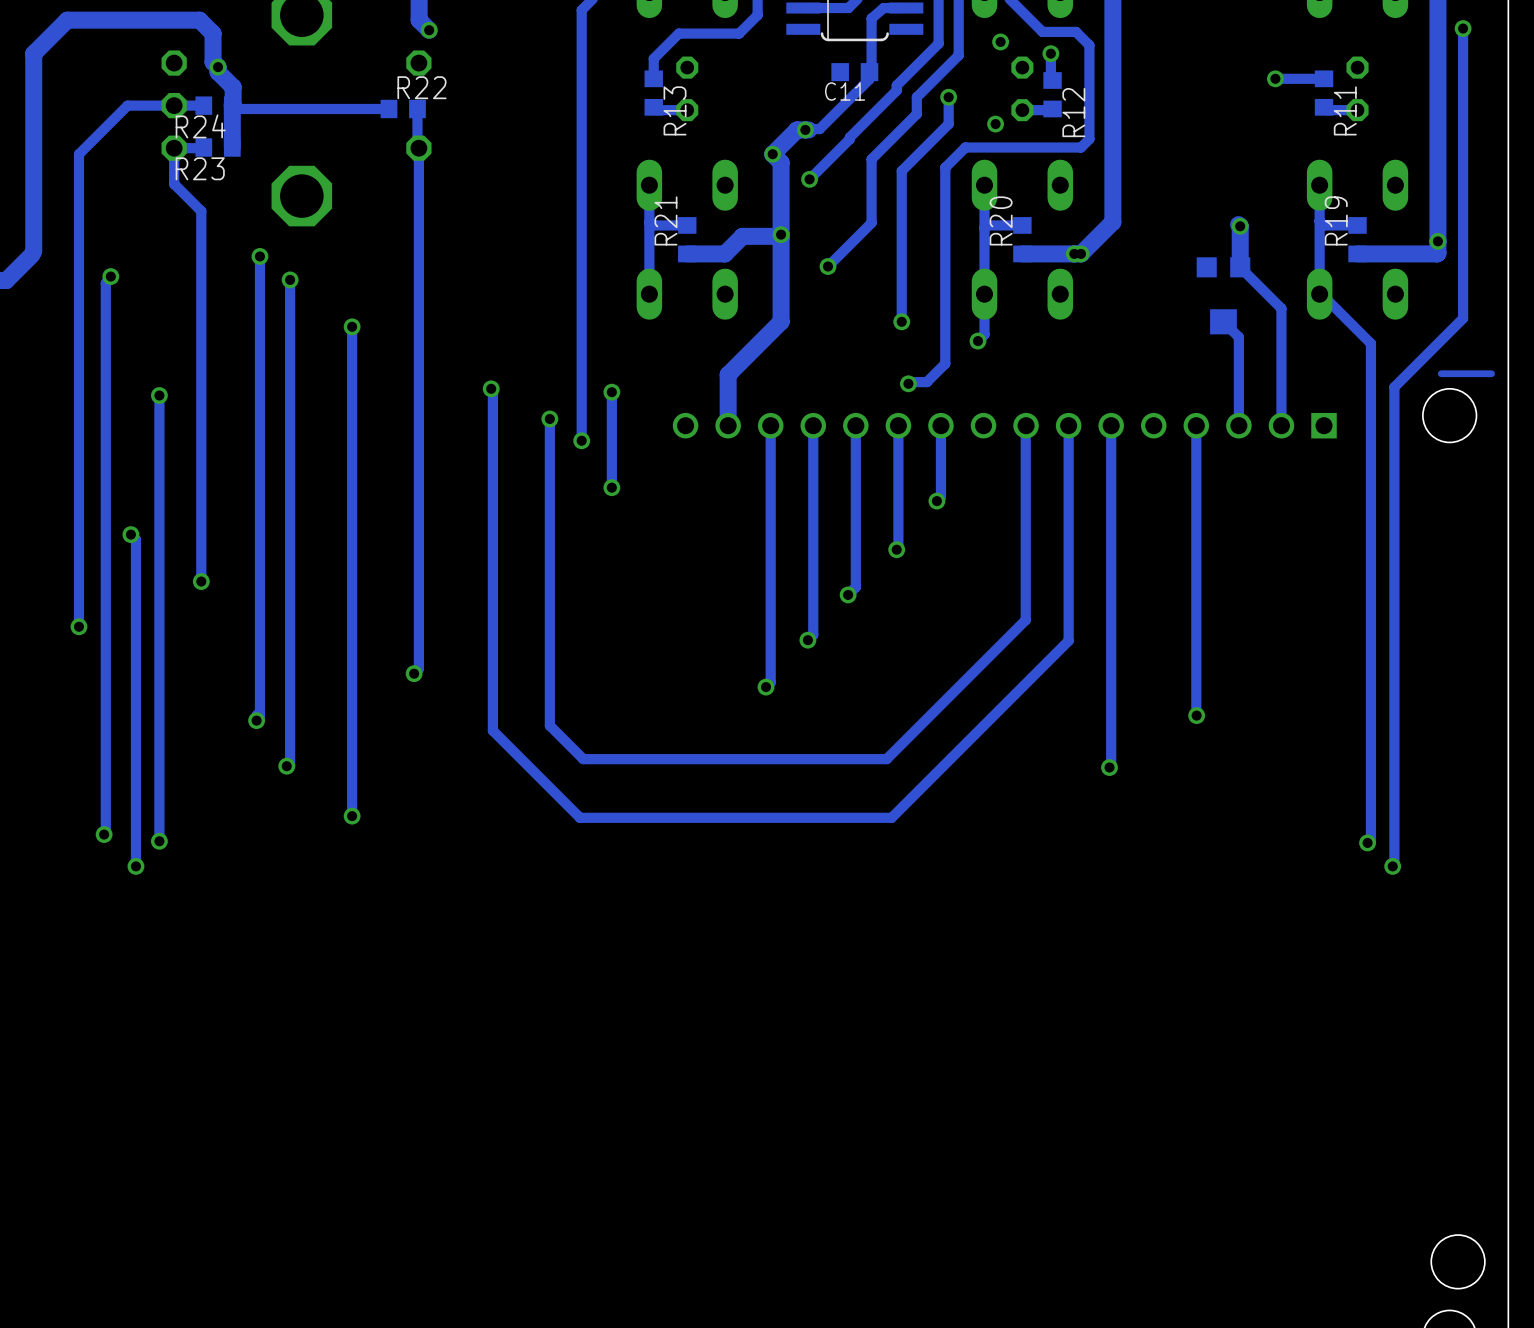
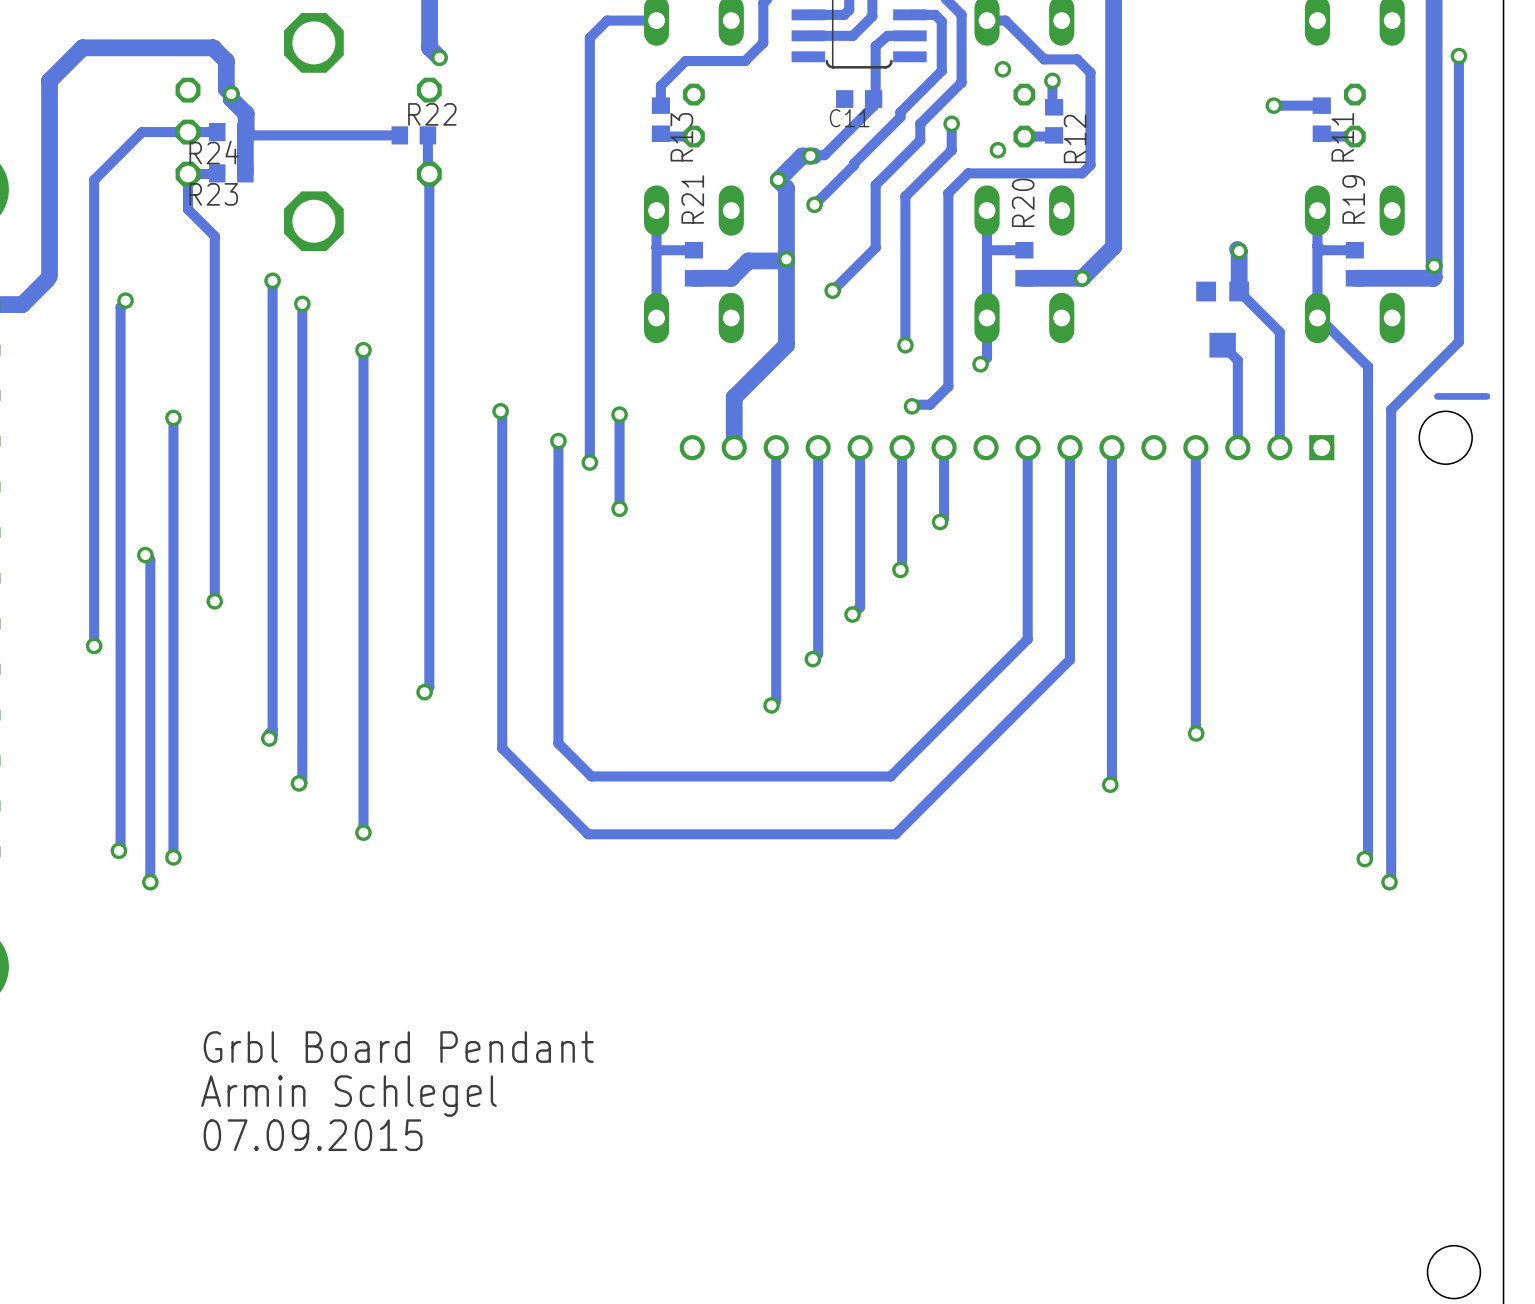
R21 name position: R21 (665, 220) -> R21 (692, 199)
R20 name position: R20 (1001, 220) -> R20 (1023, 202)
R19 name position: R19 (1336, 220) -> R19 (1353, 199)
via: (1074, 253) -> none
text: none -> Grbl Board Pendant (398, 1047)
text: none -> Armin Schlegel (348, 1096)
text: none -> 07.09.2015 (313, 1135)

